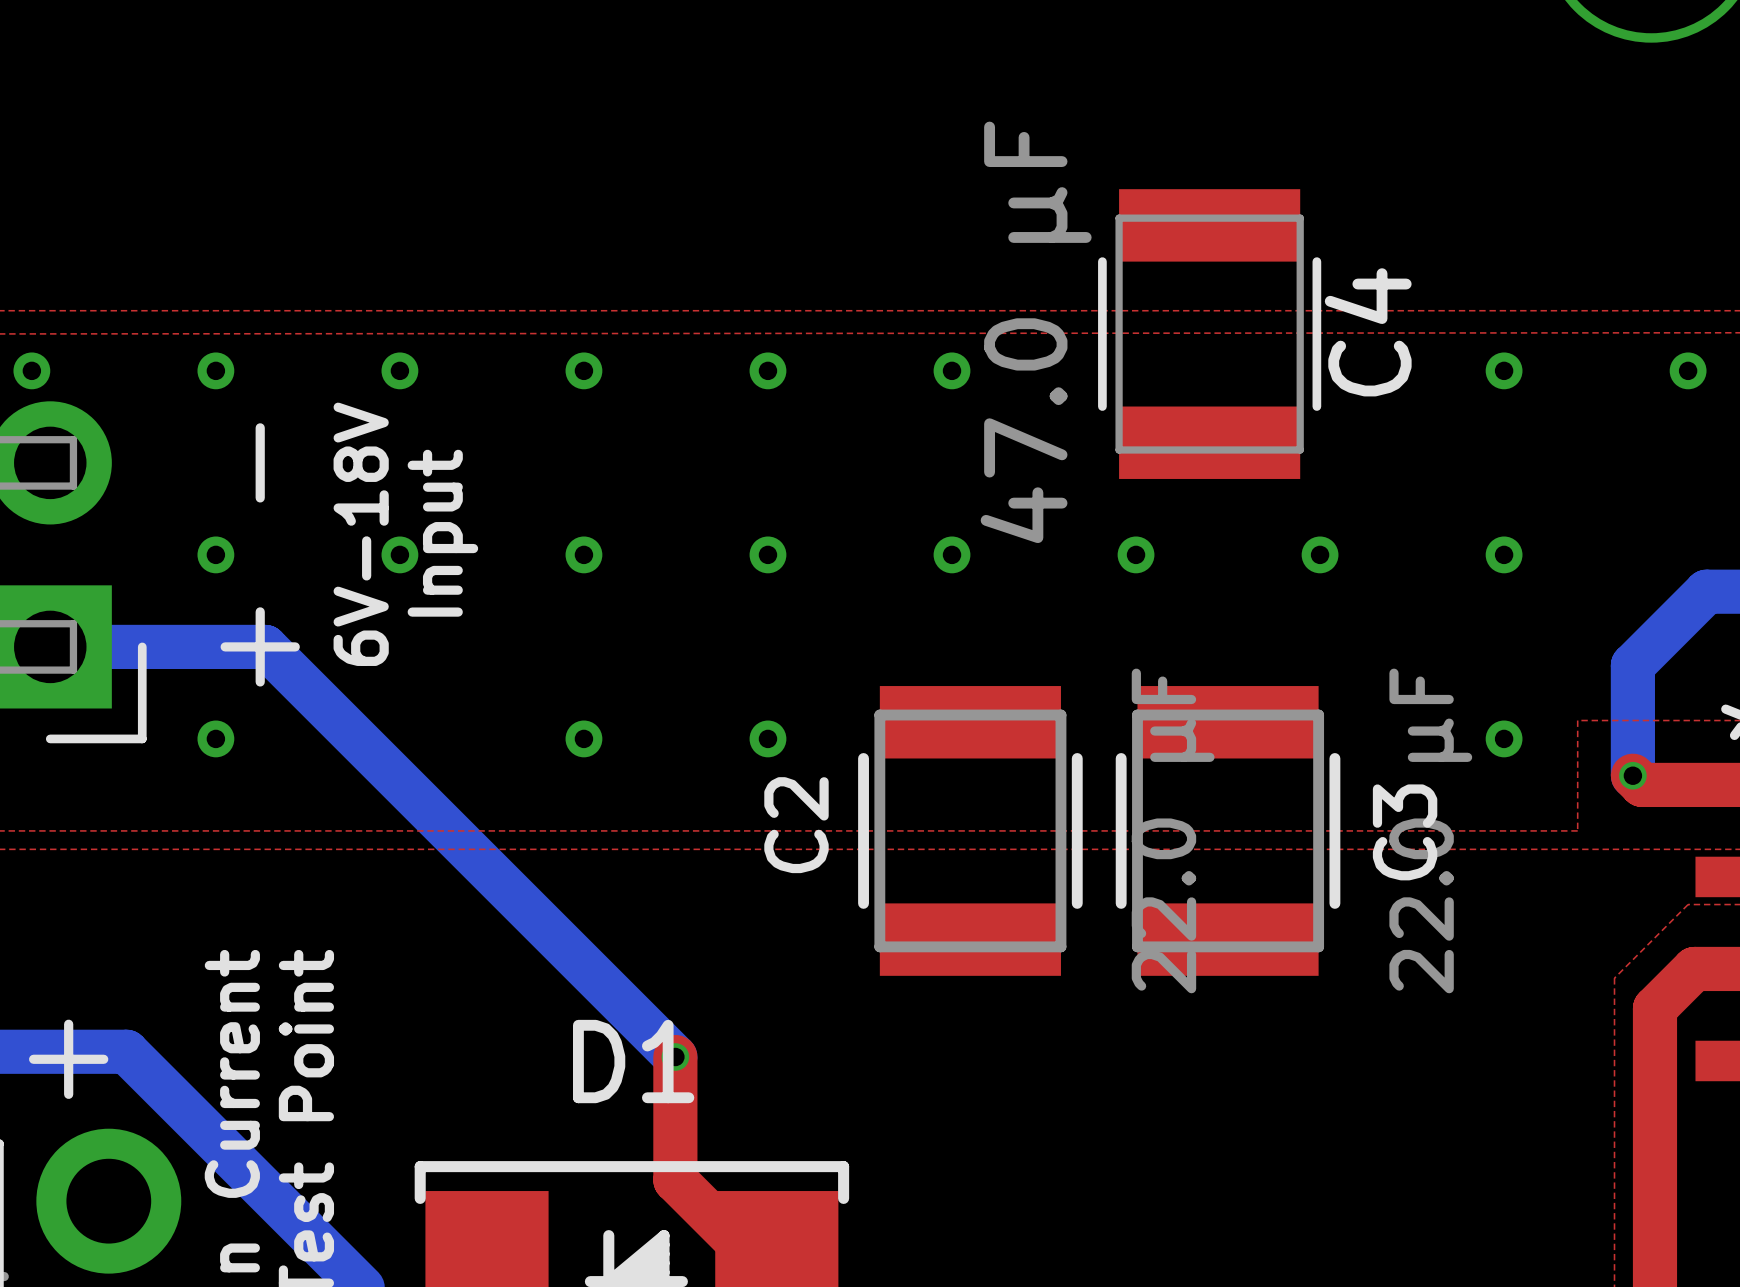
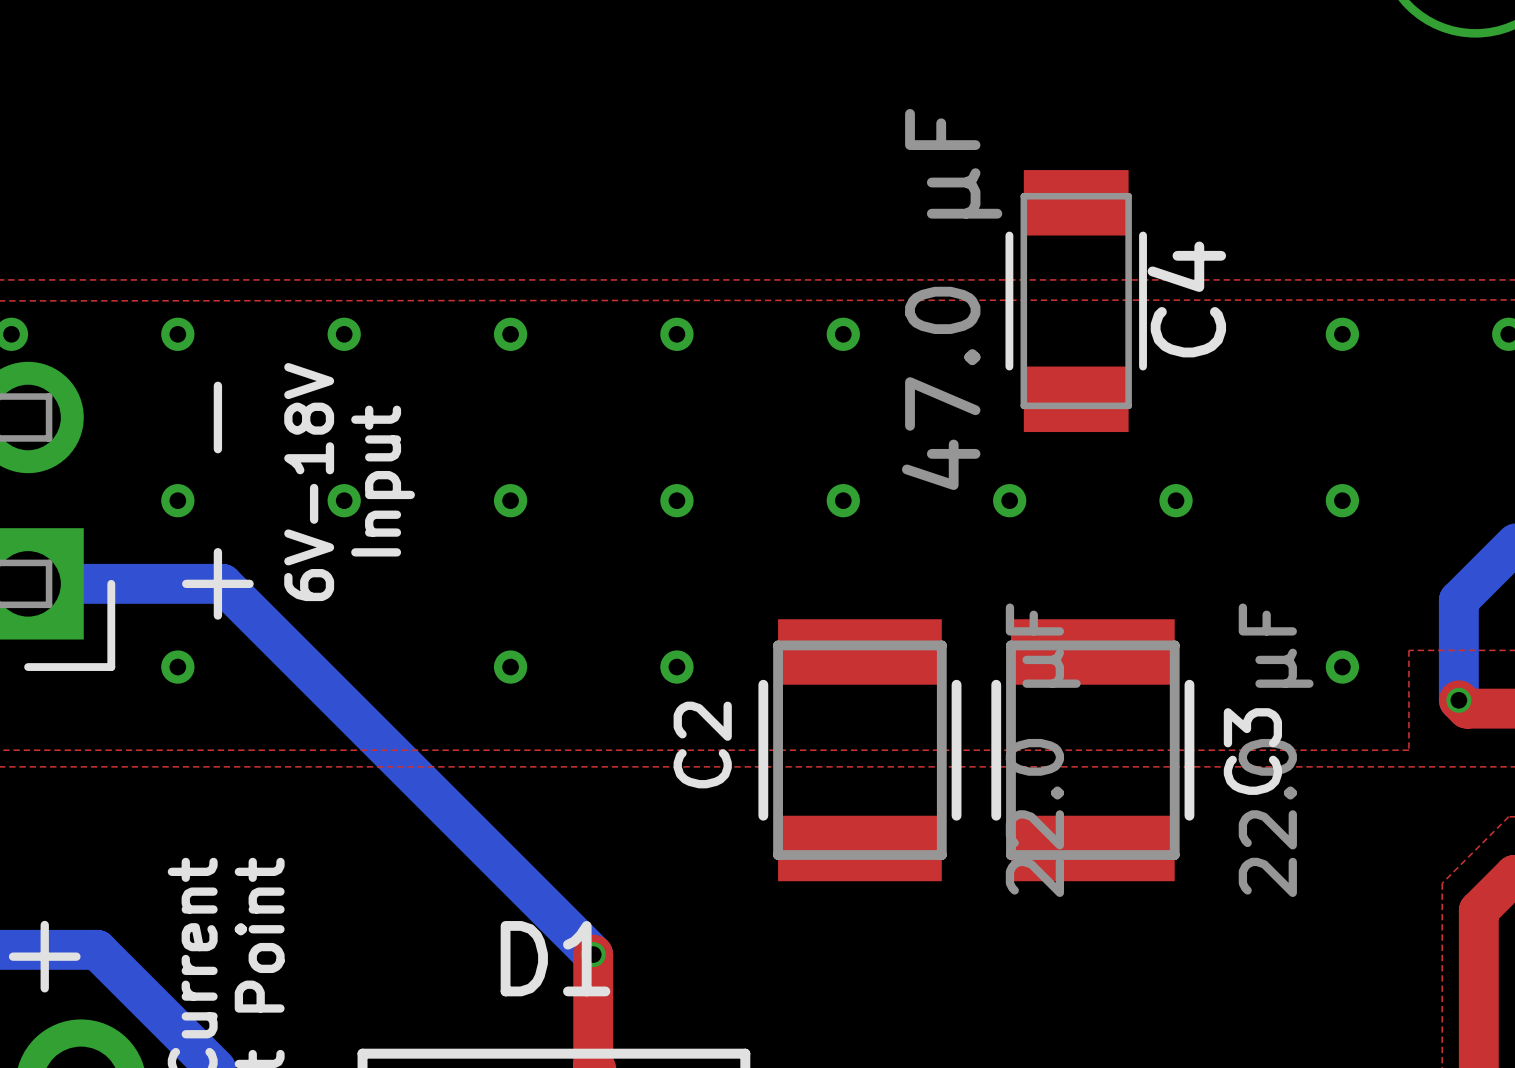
C4 footprint: [1098, 189, 1322, 479] -> [1005, 170, 1147, 433]
C4 value position: 47.0 μF (1036, 332) -> 47.0 μF (952, 299)
C4 name position: C4 (1368, 332) -> C4 (1186, 299)

